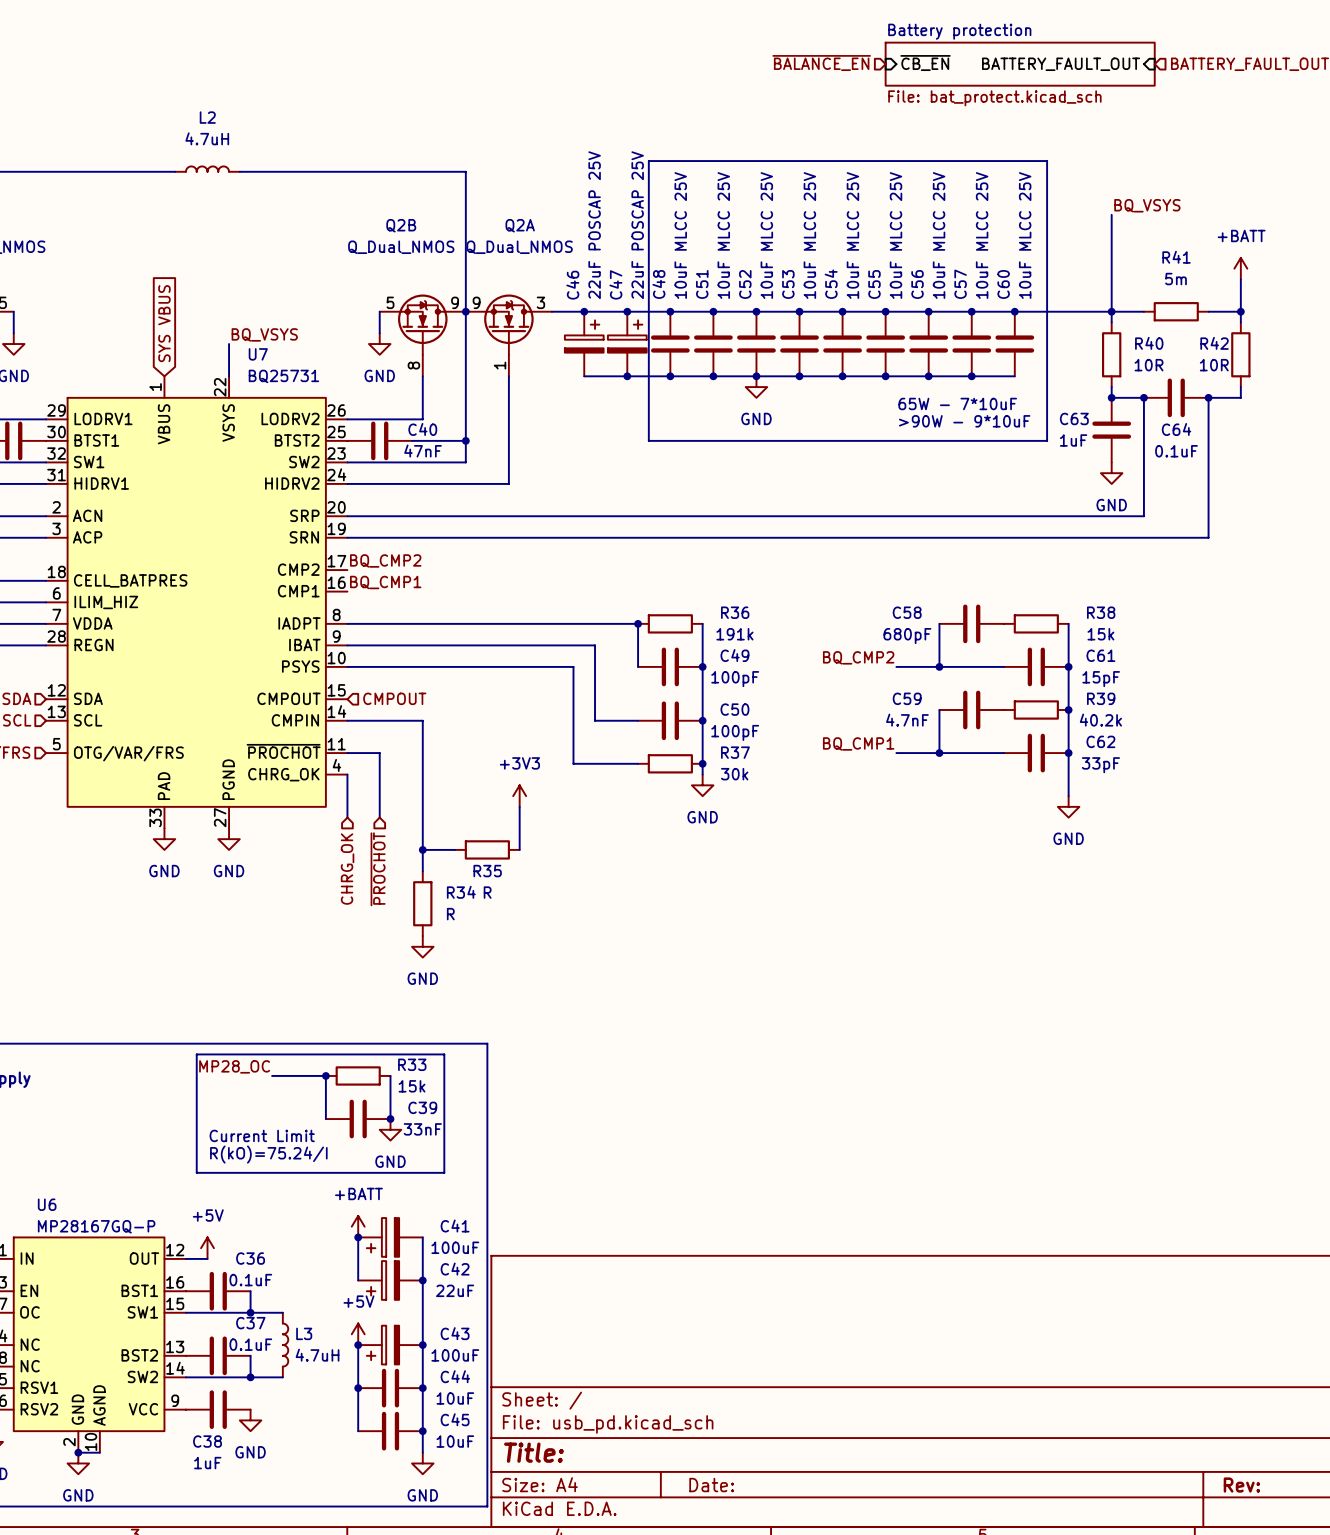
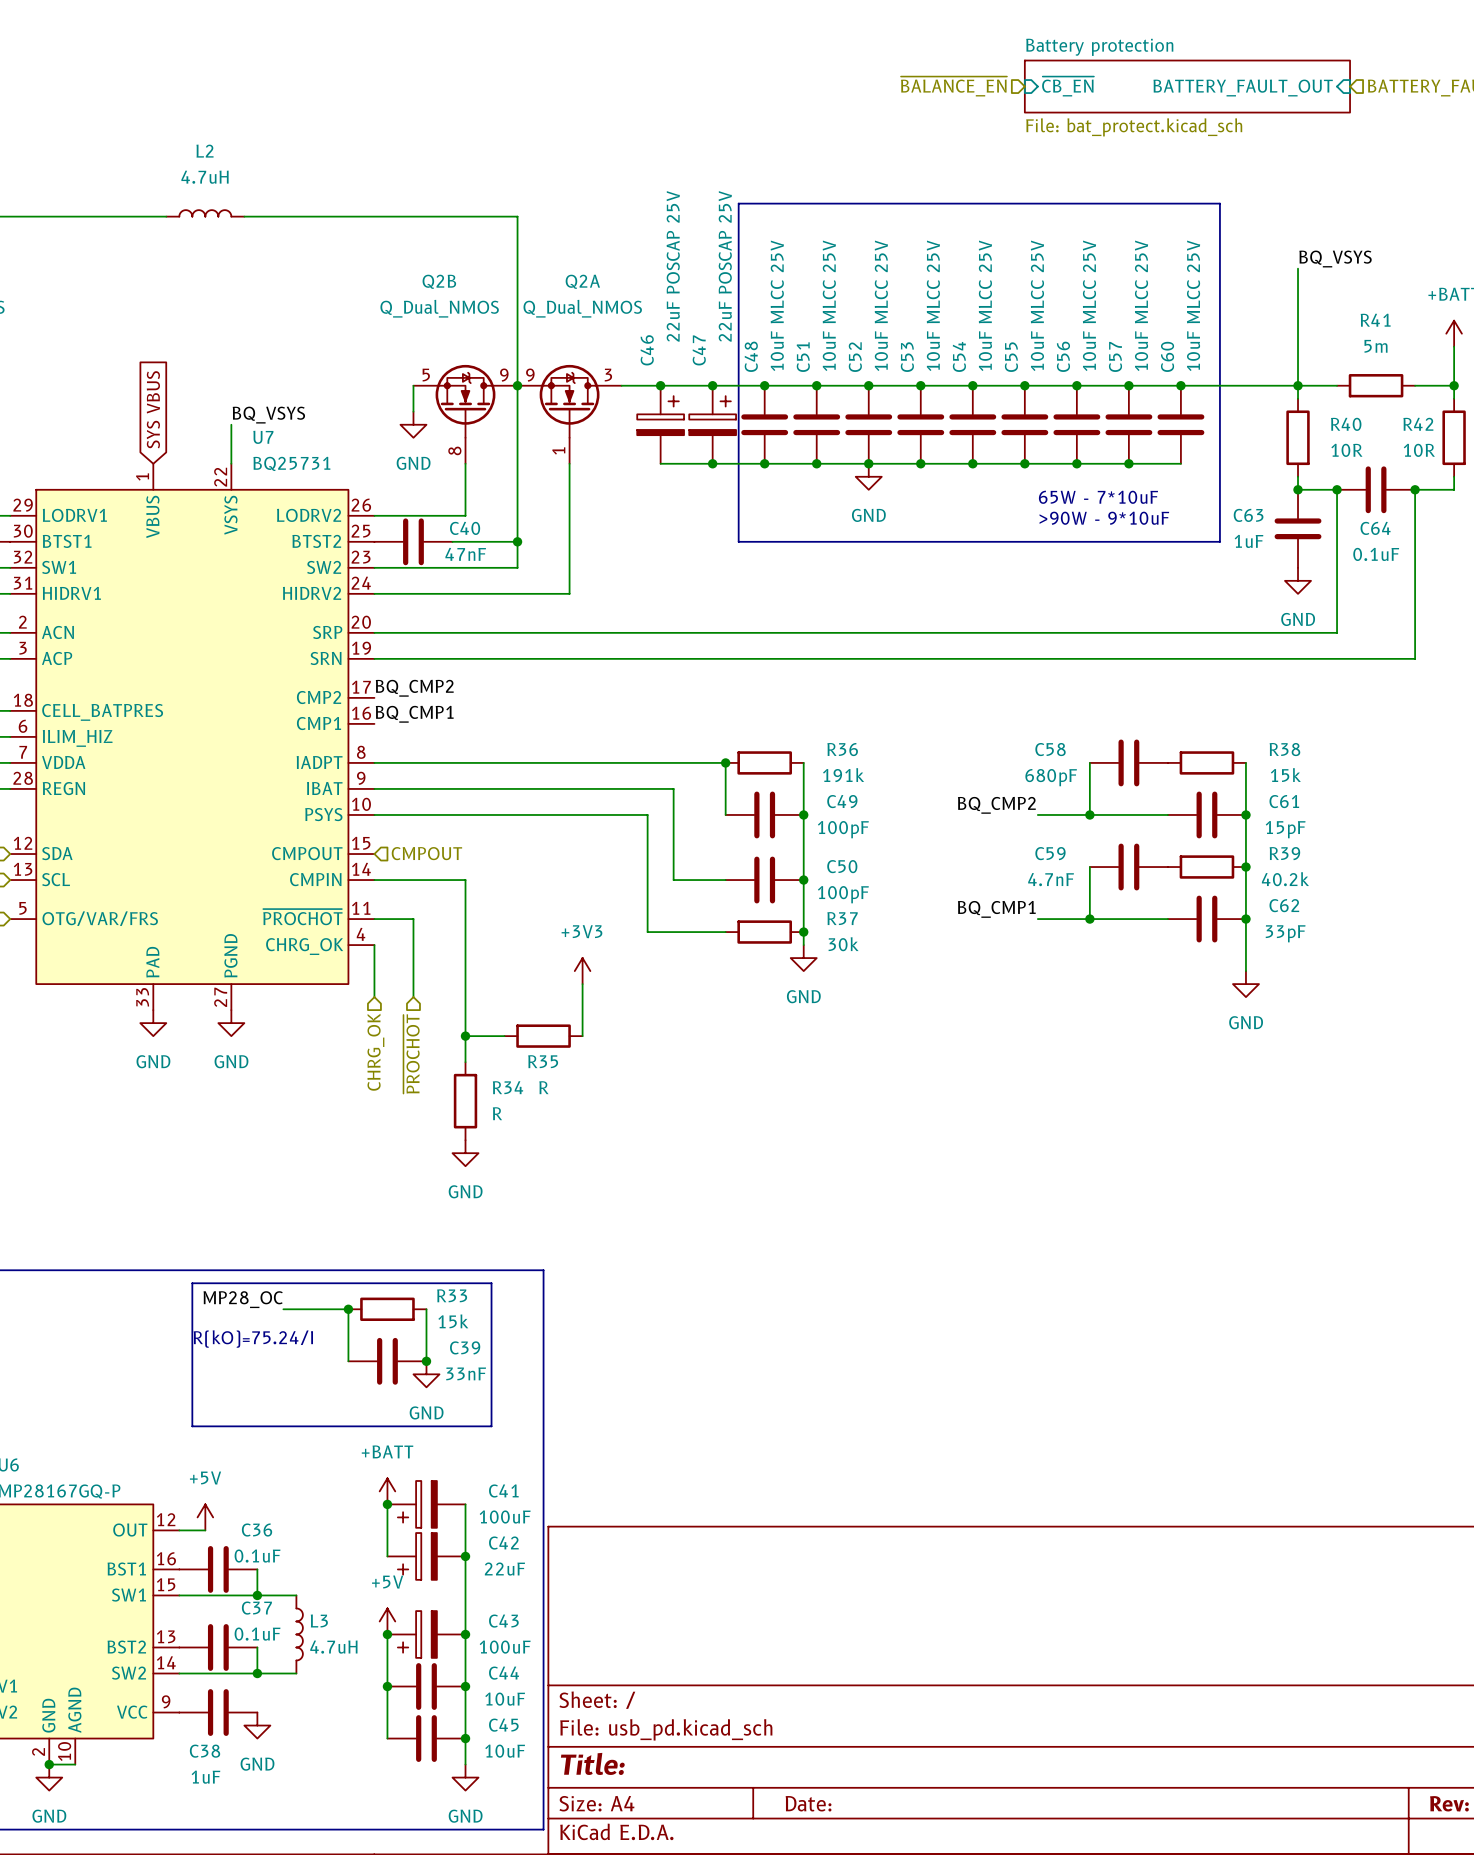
text: Current Limit (262, 1135) -> none
text position: R(kO)=75.24/I (268, 1154) -> R(kO)=75.24/I (253, 1339)

